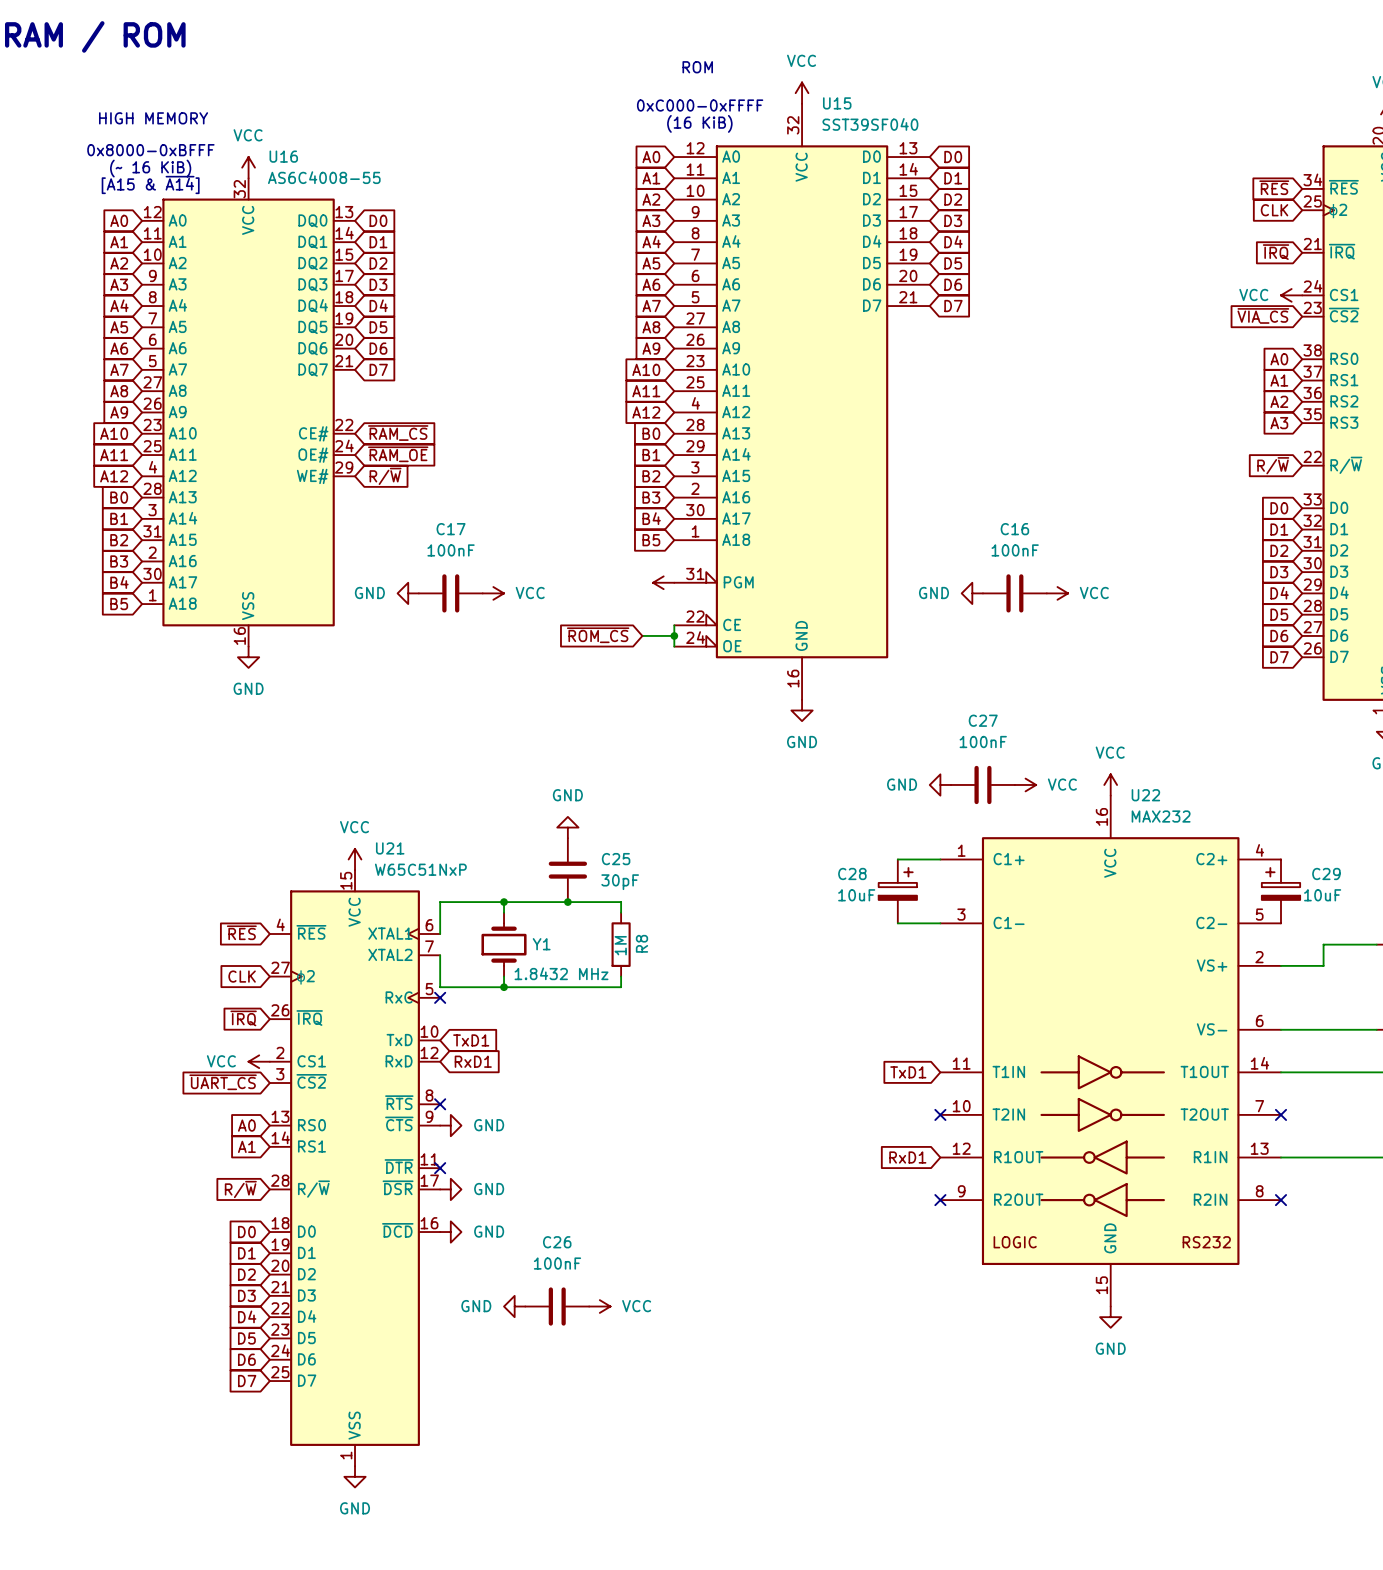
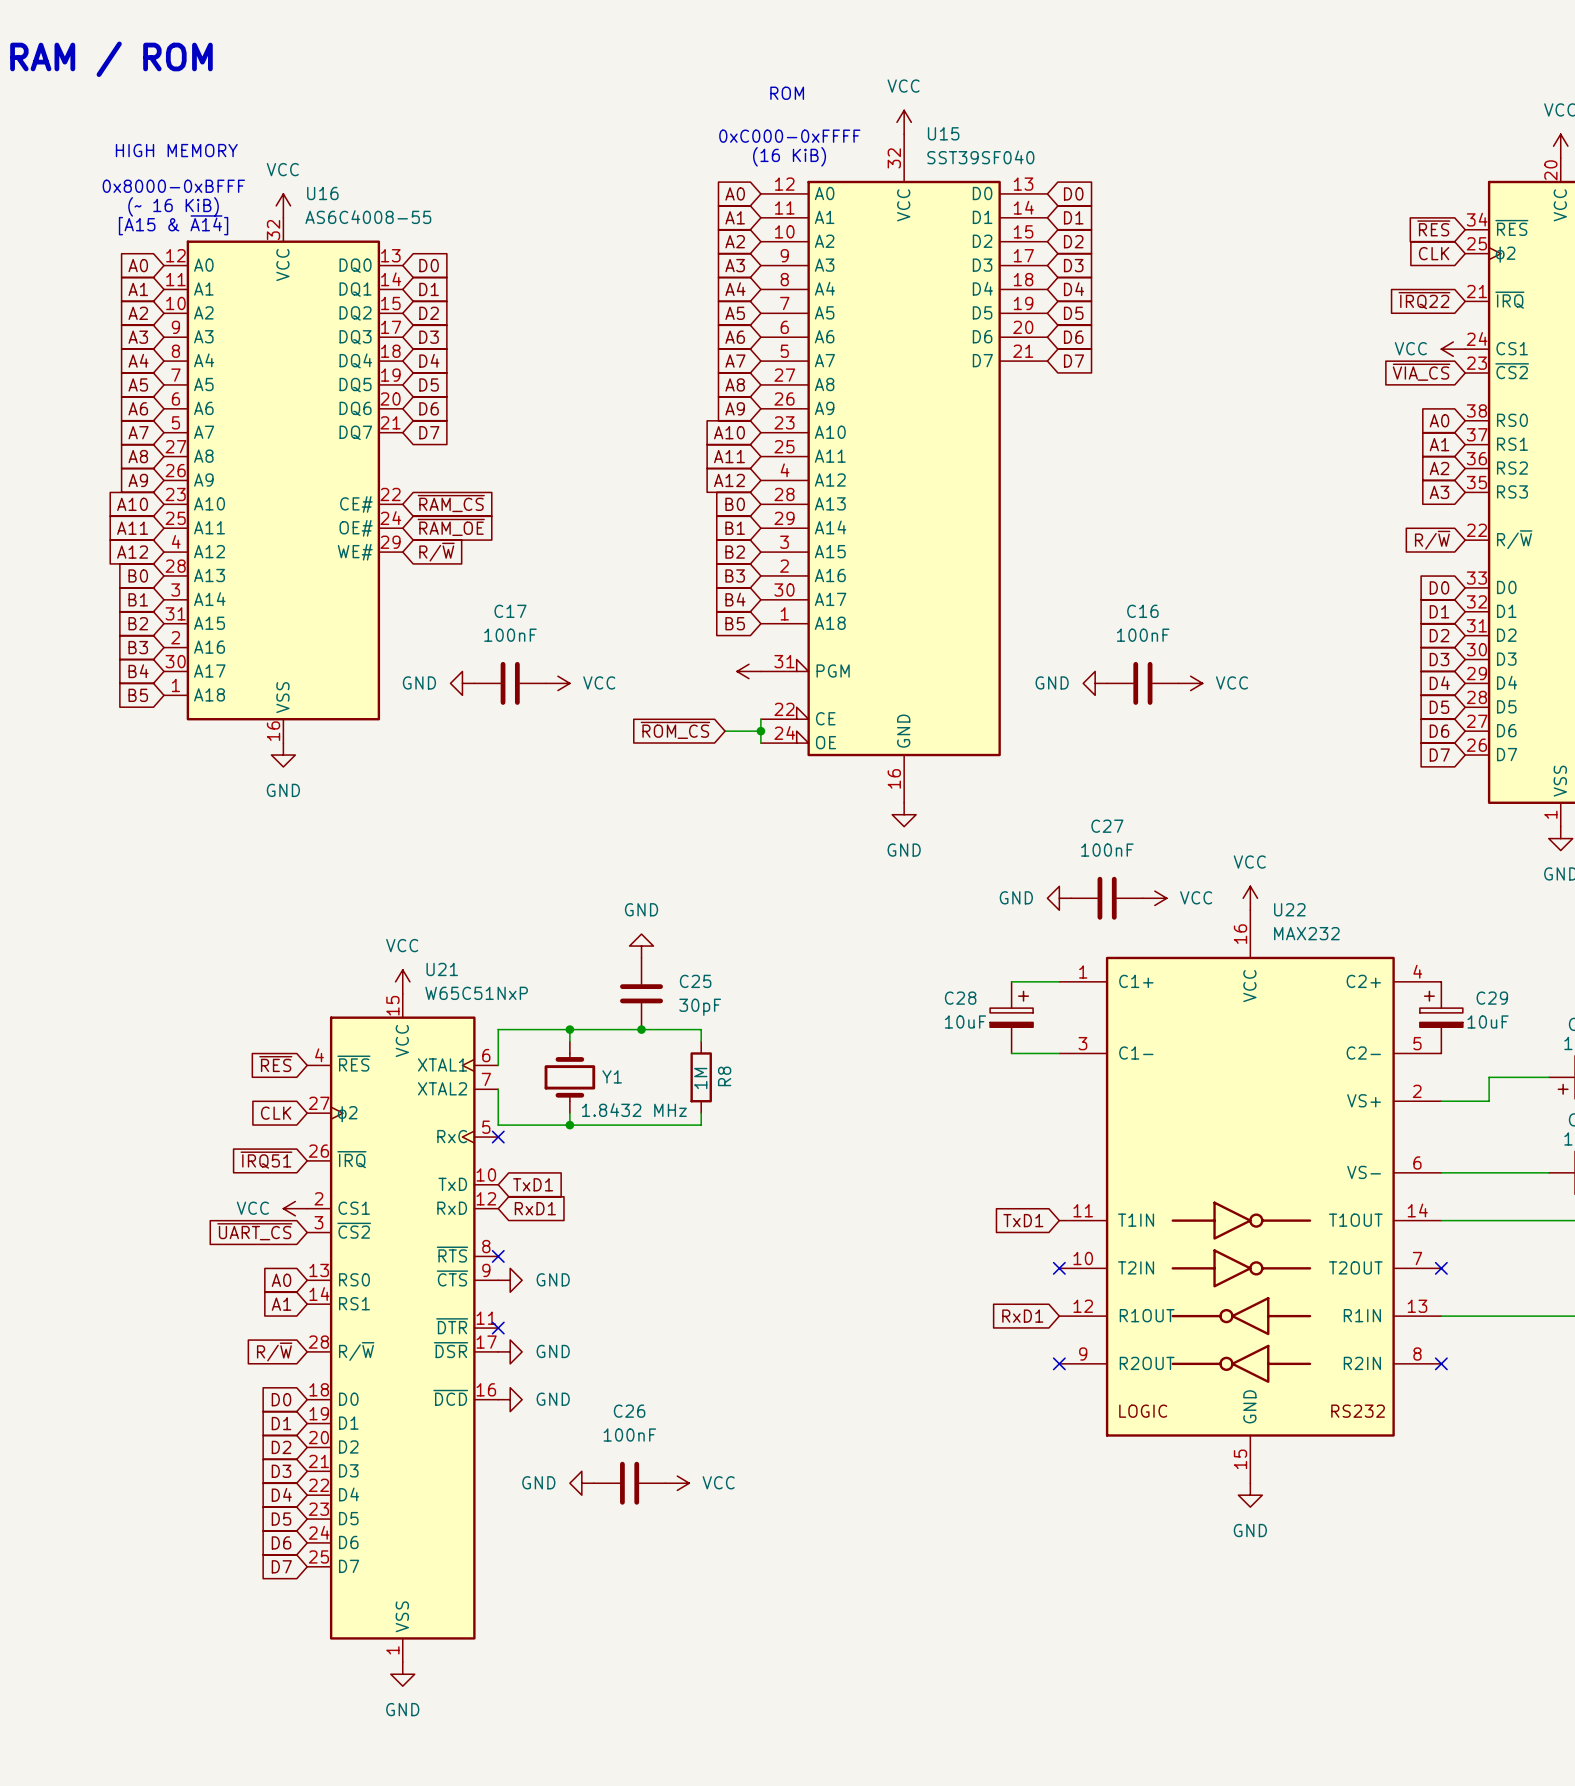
global label: ~{IRQ} (1276, 252) -> ~{IRQ22} (1424, 300)
global label: ~{IRQ} (243, 1018) -> ~{IRQ51} (266, 1160)

